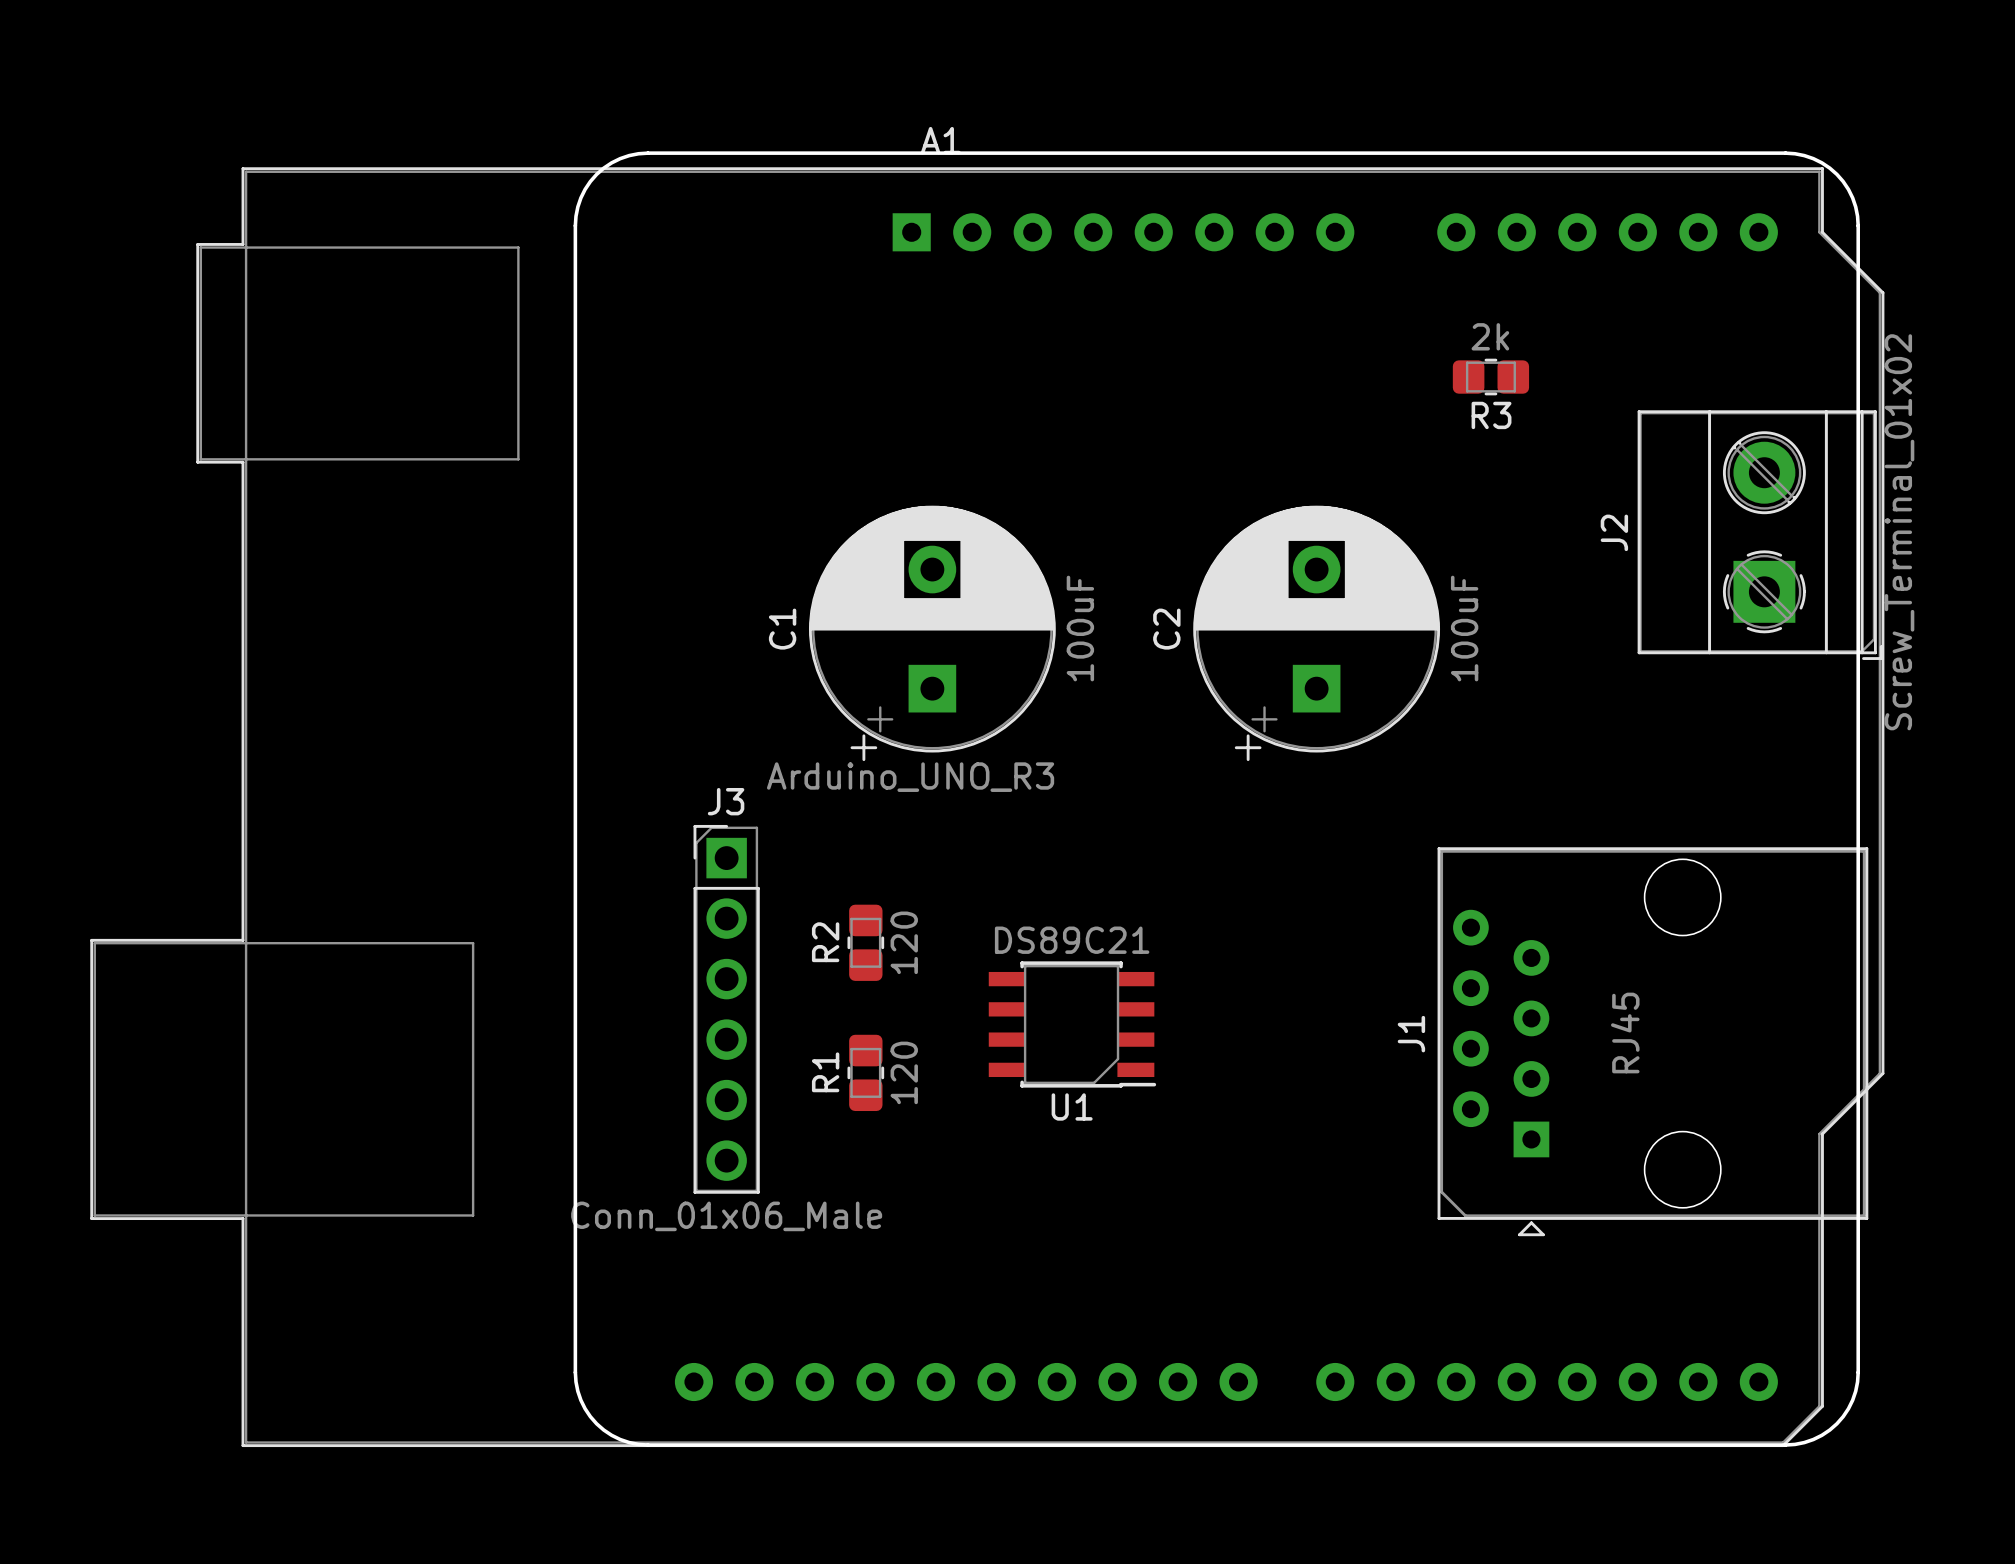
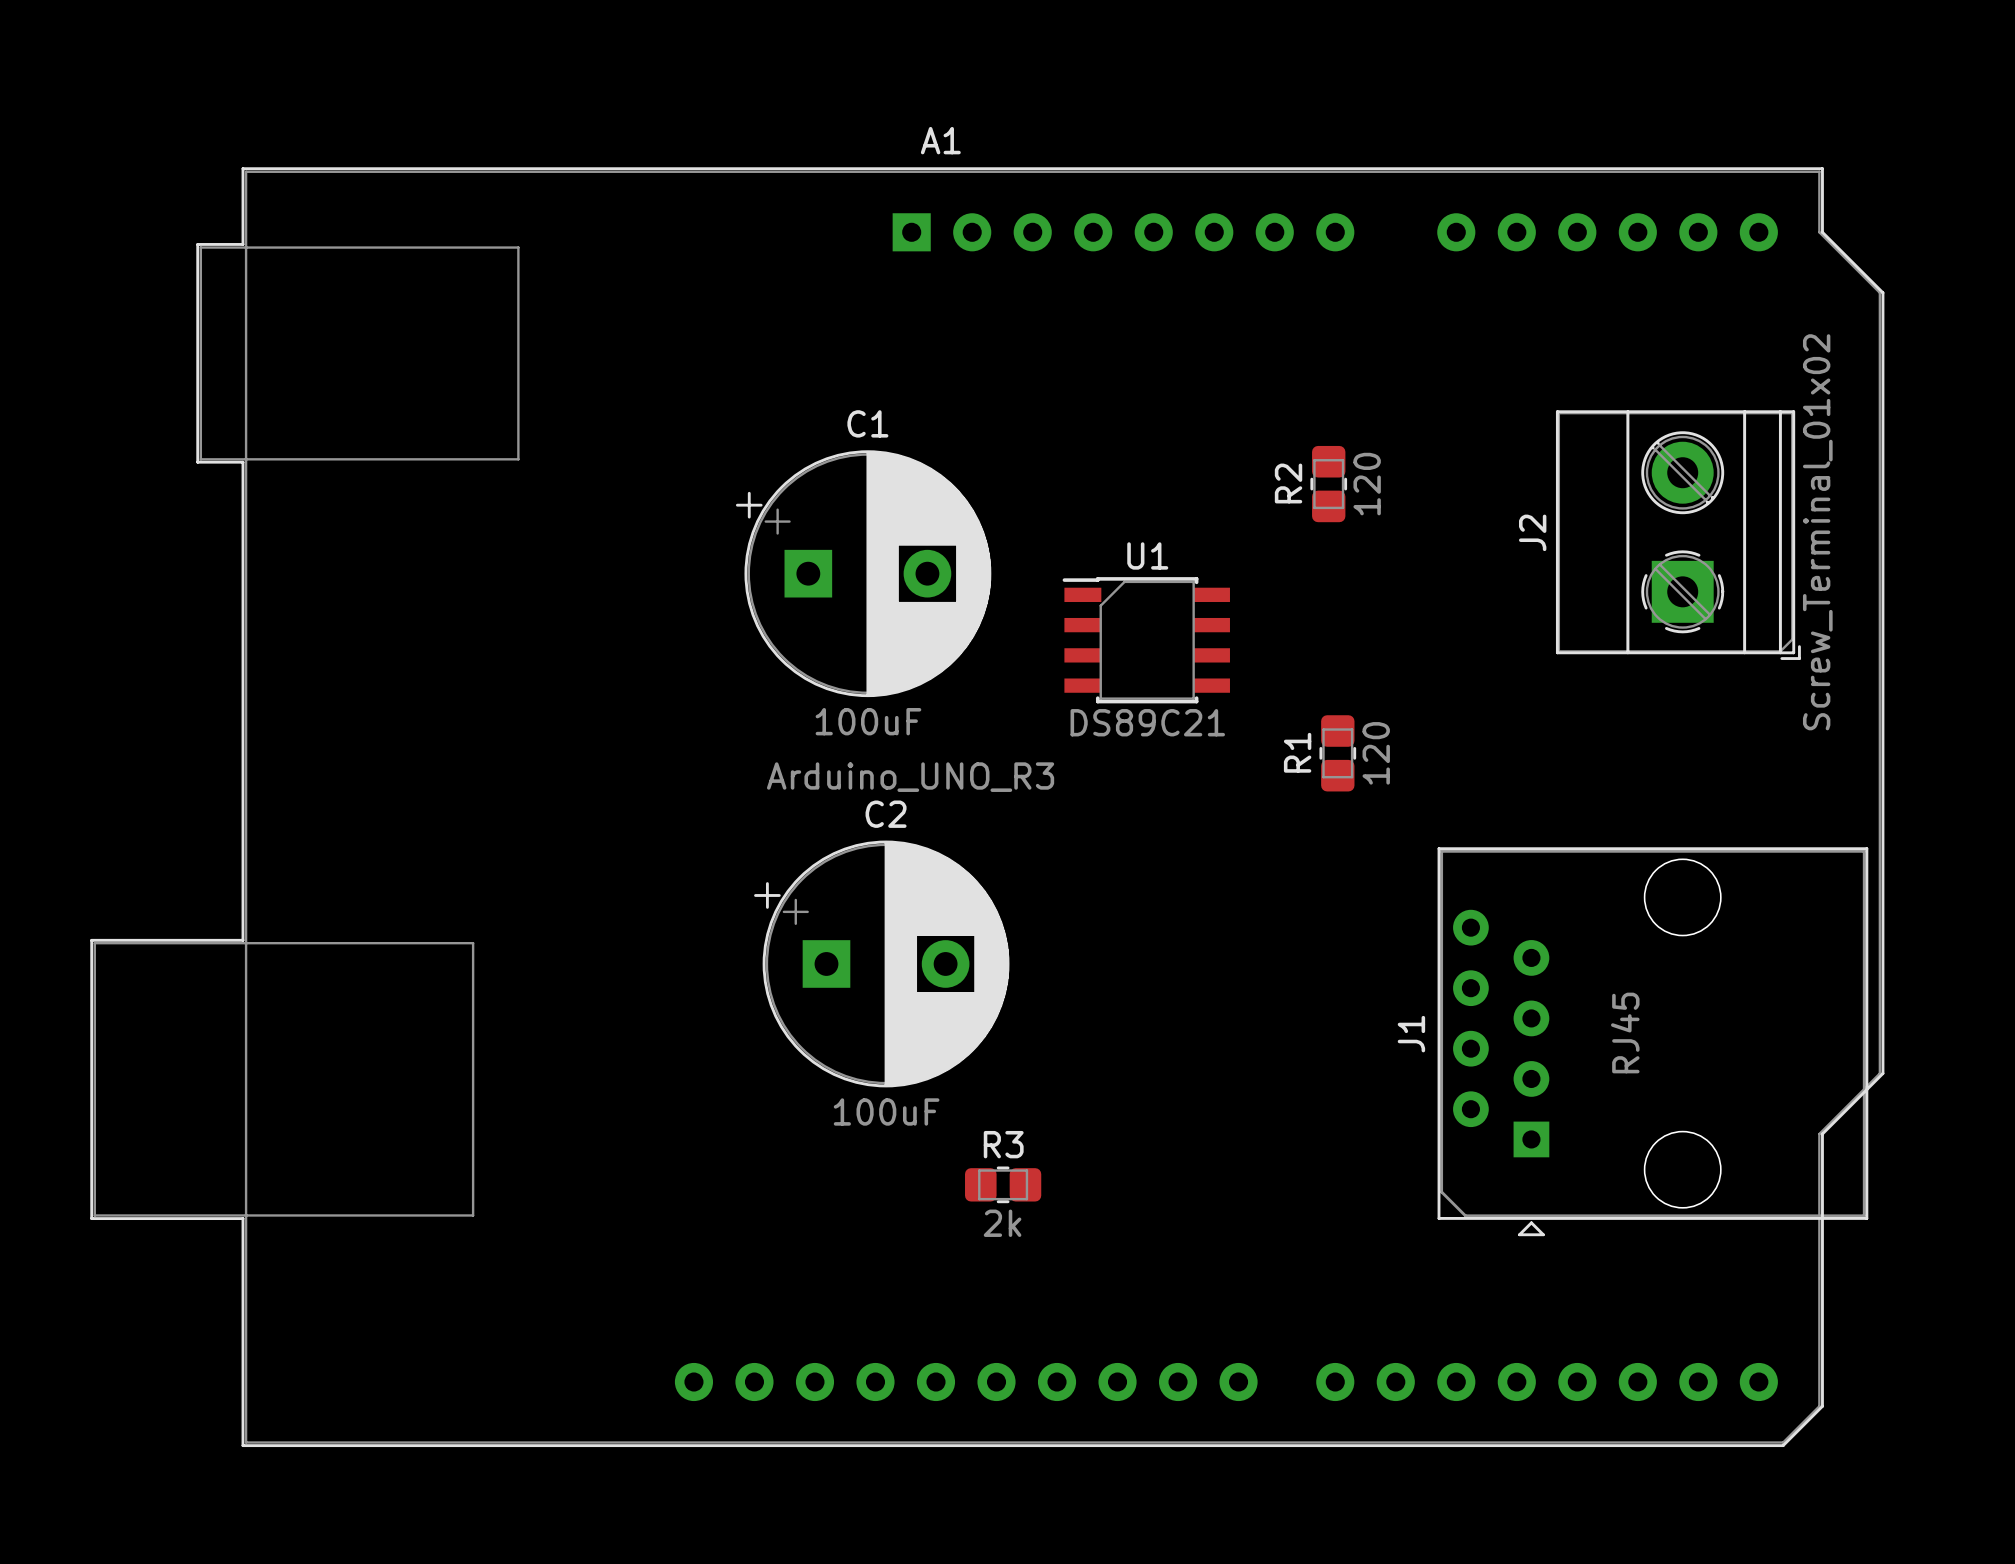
board edge: (647, 153) (1785, 153) (1813, 158) (1836, 174) (1852, 197) (1858, 225) (1858, 1372) (1852, 1400) (1836, 1423) (1813, 1439) (1785, 1445) (647, 1445) (620, 1439) (596, 1423) (580, 1400) (575, 1372) (575, 225) (580, 197) (596, 174) (620, 158) (647, 153) -> none
R3 value position: 2k (1490, 336) -> 2k (1002, 1223)
R3 position: (1490, 377) -> (1003, 1184)
R3 name position: R3 (1491, 415) -> R3 (1003, 1144)
J2 position: (1760, 535) -> (1678, 535)
C1 rotation: 0° (932, 633) -> 90° clockwise (863, 573)
C2 rotation: 0° (1316, 633) -> 90° clockwise (881, 963)
C2 position: (1316, 633) -> (881, 963)
R2 position: (865, 942) -> (1328, 484)
J3: Conn_01x06_Male (726, 1009) -> none
U1 rotation: 0° (1072, 1024) -> 180° (1146, 640)
U1 position: (1072, 1024) -> (1146, 640)
R1 position: (865, 1072) -> (1337, 753)

